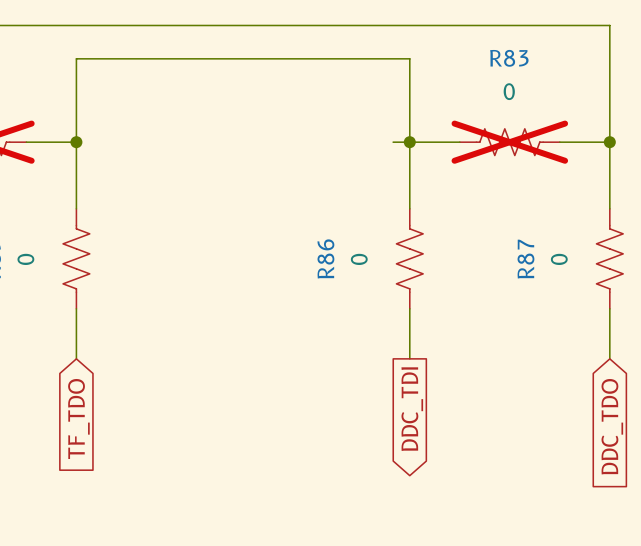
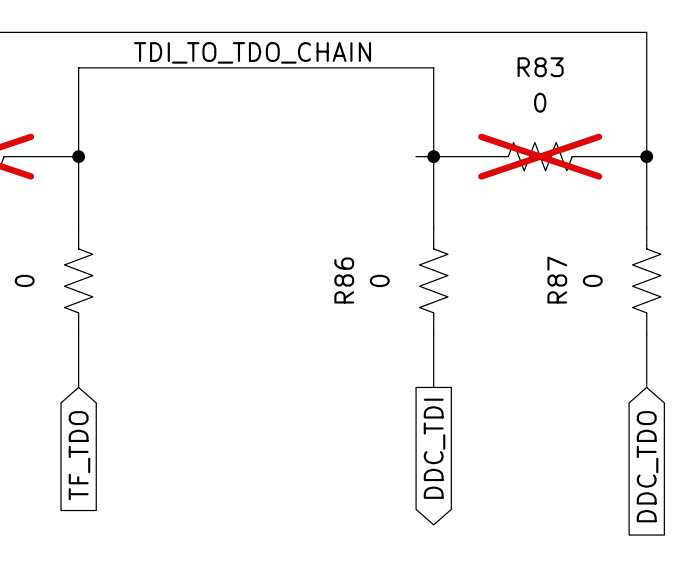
label: none -> TDI_TO_TDO_CHAIN (252, 52)

